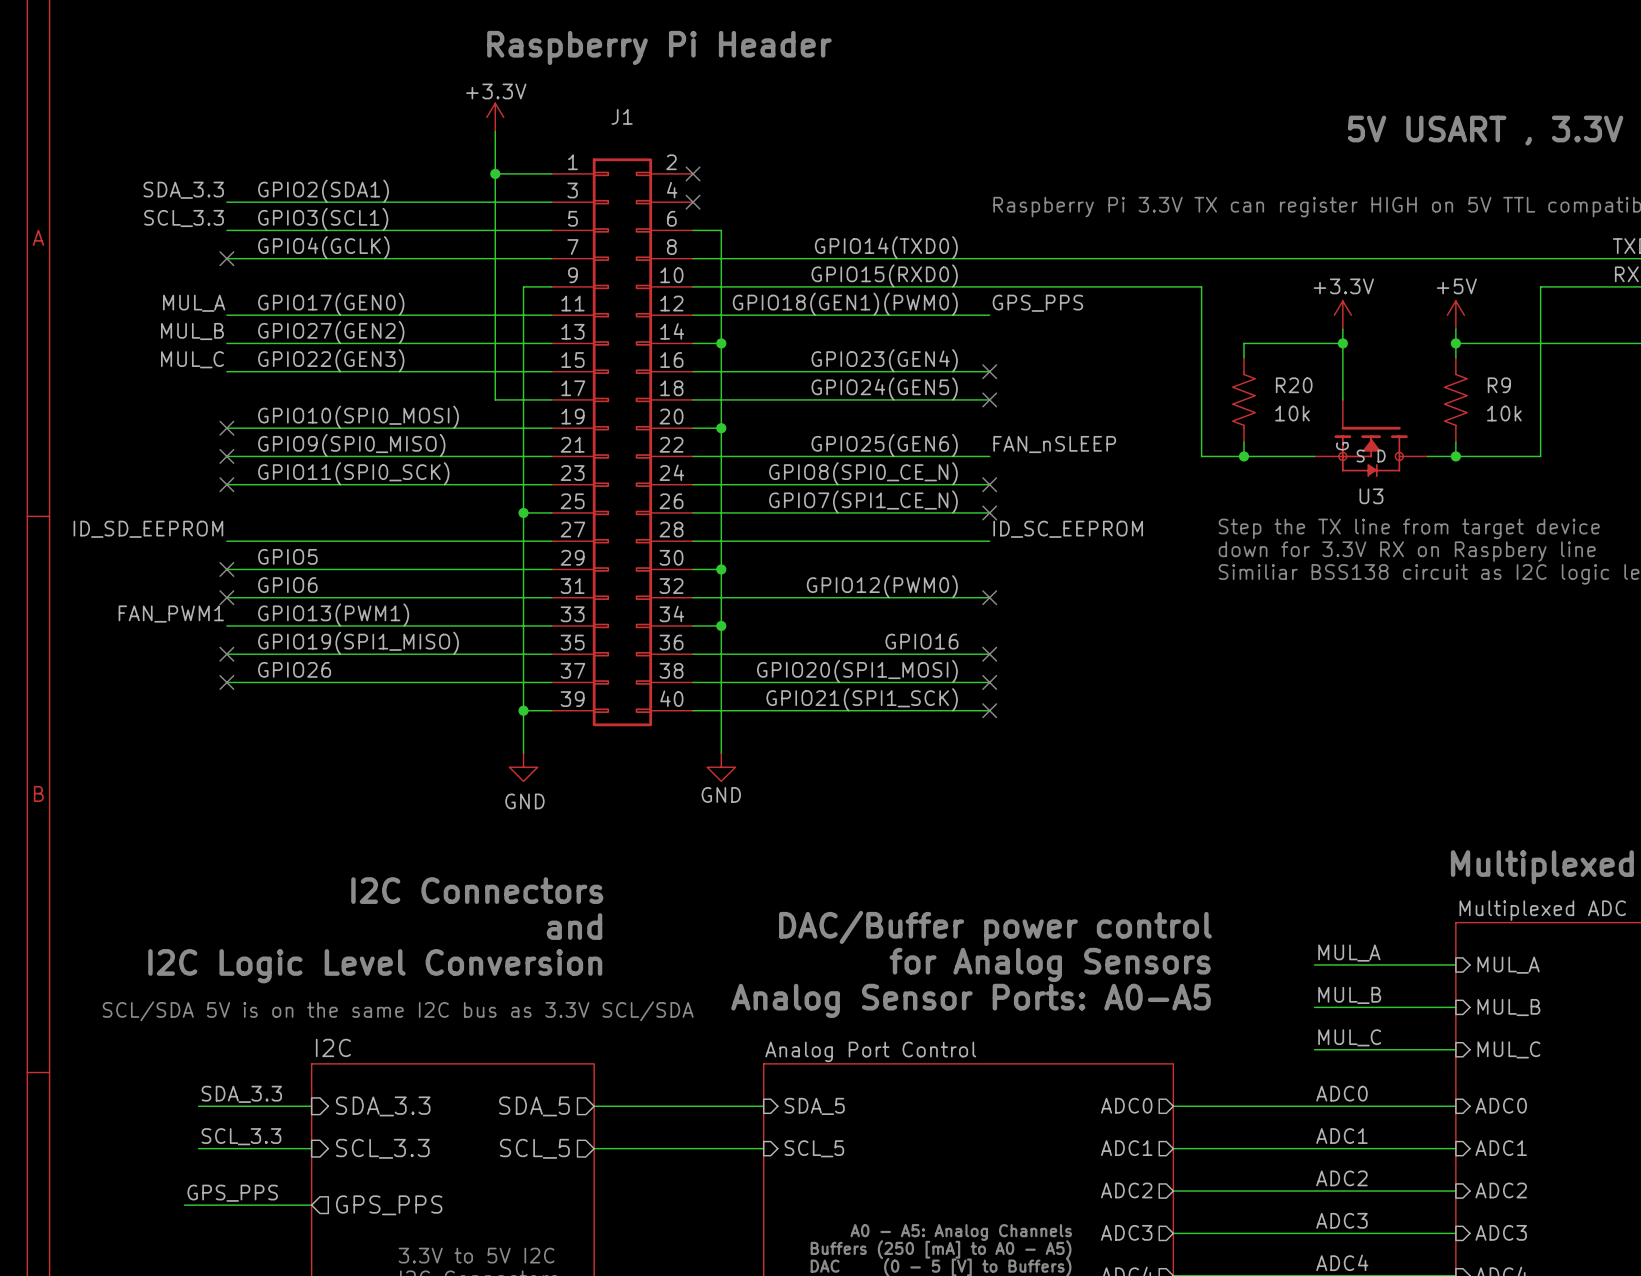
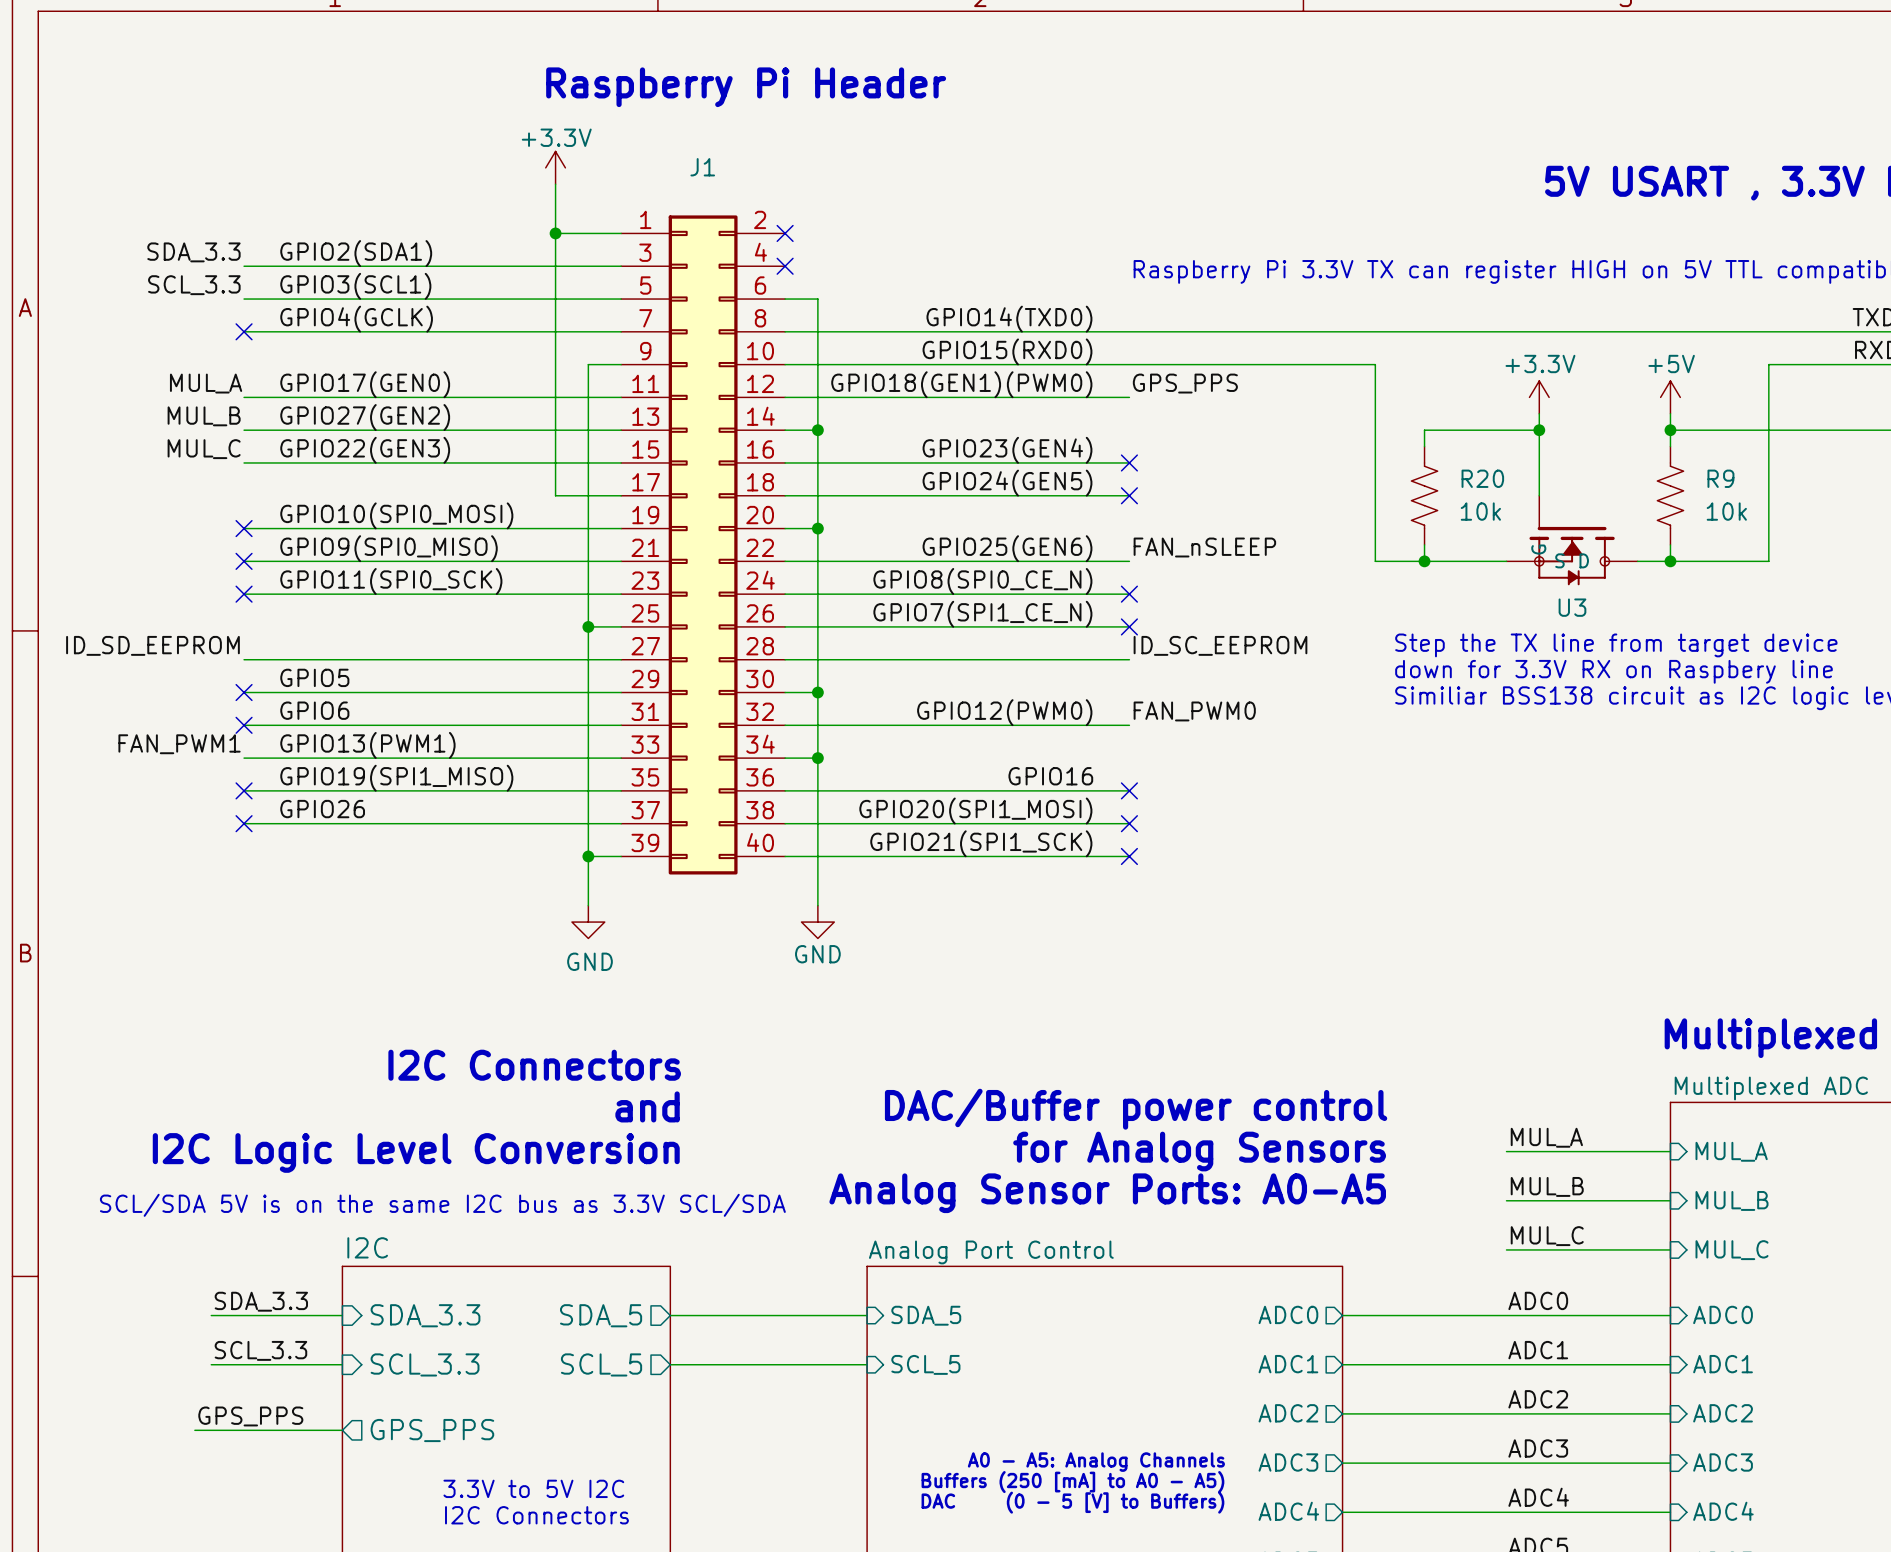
label: none -> FAN_PWM0 (1194, 711)
no-connect mark: (989, 597) -> none

